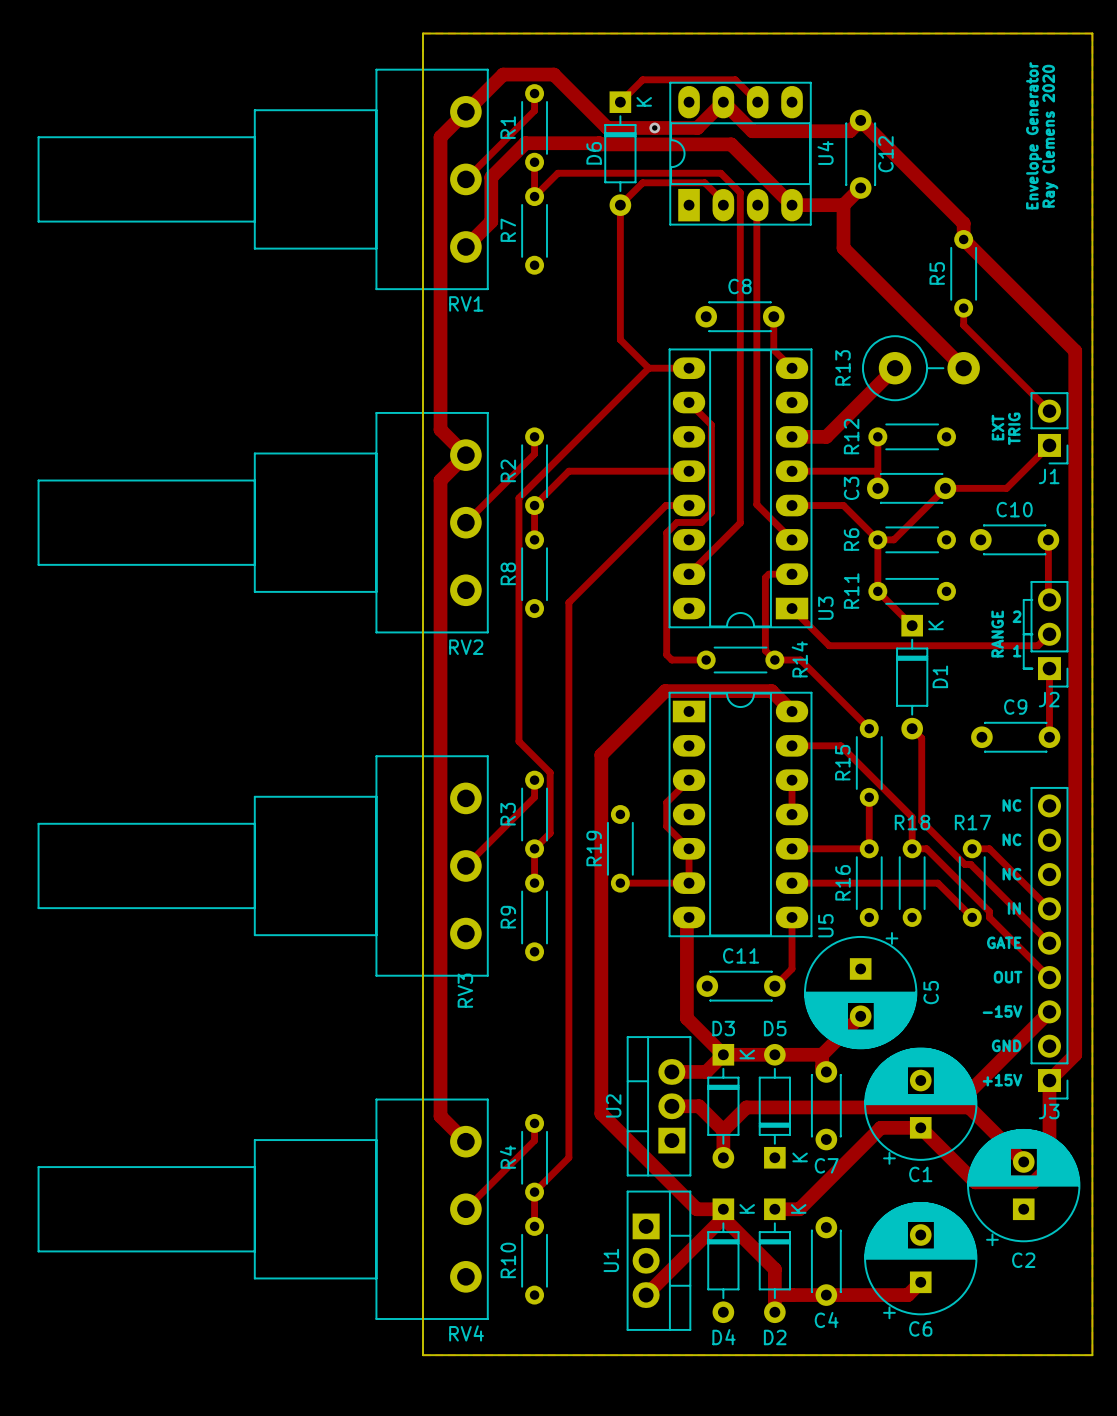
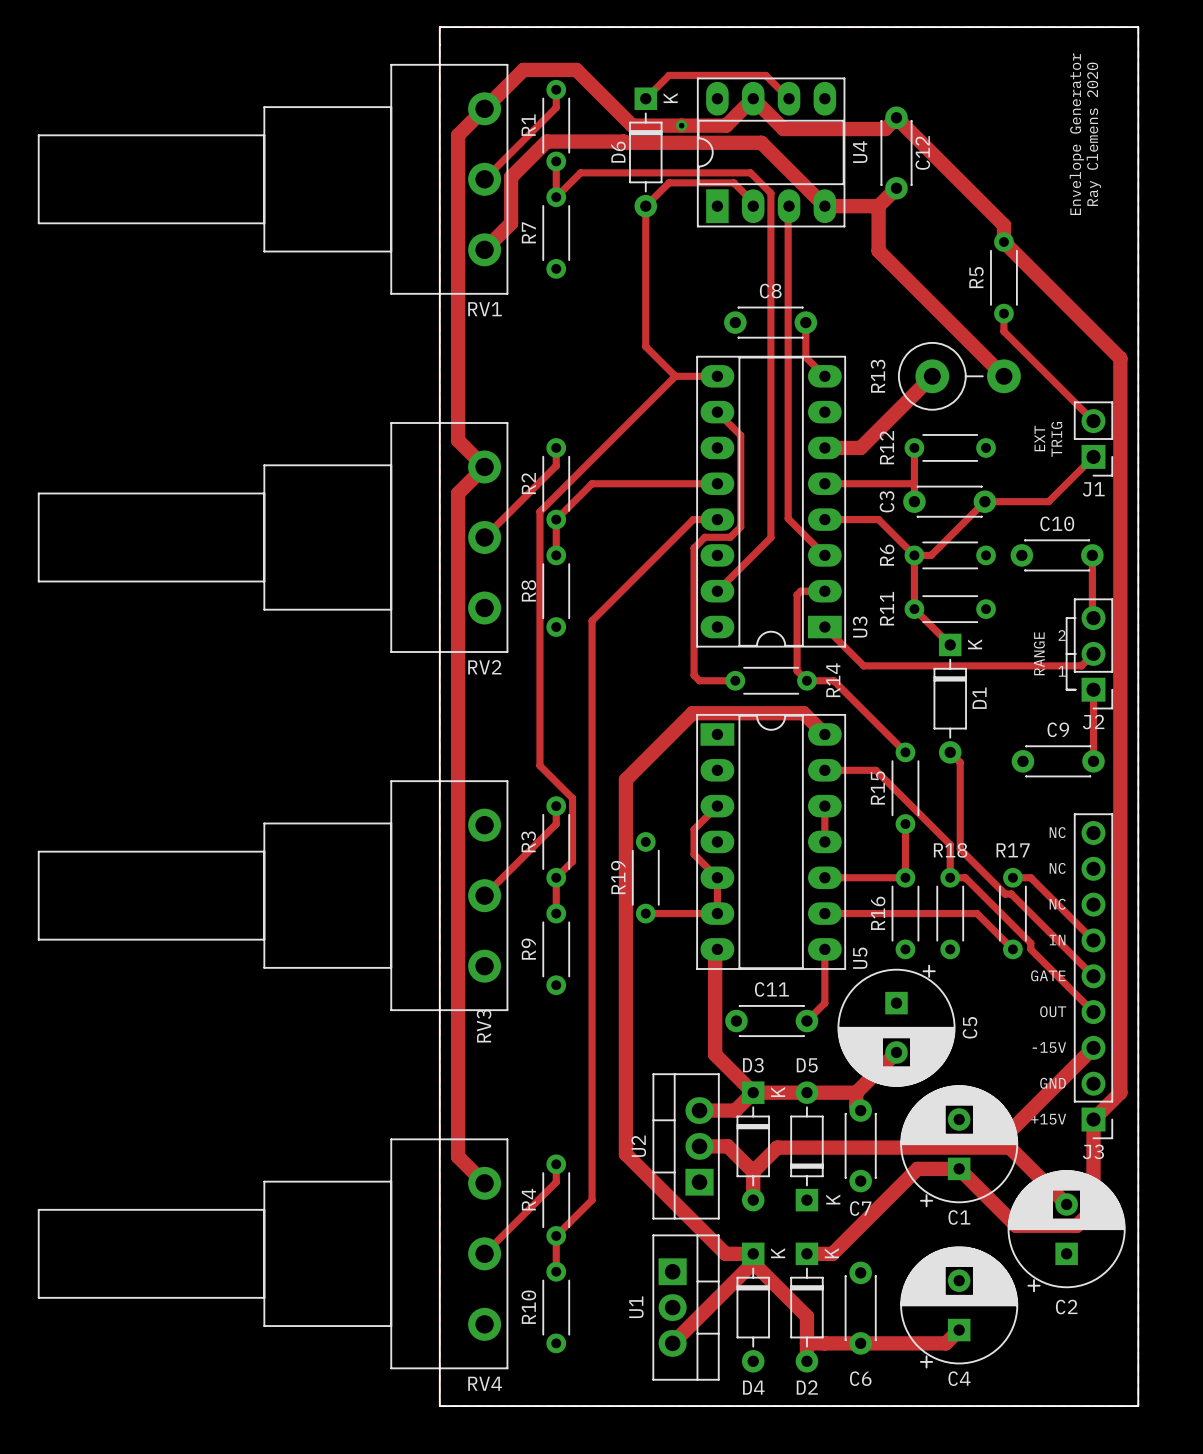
C4 name position: C4 (826, 1320) -> C4 (959, 1378)
C6 name position: C6 (920, 1328) -> C6 (860, 1378)

